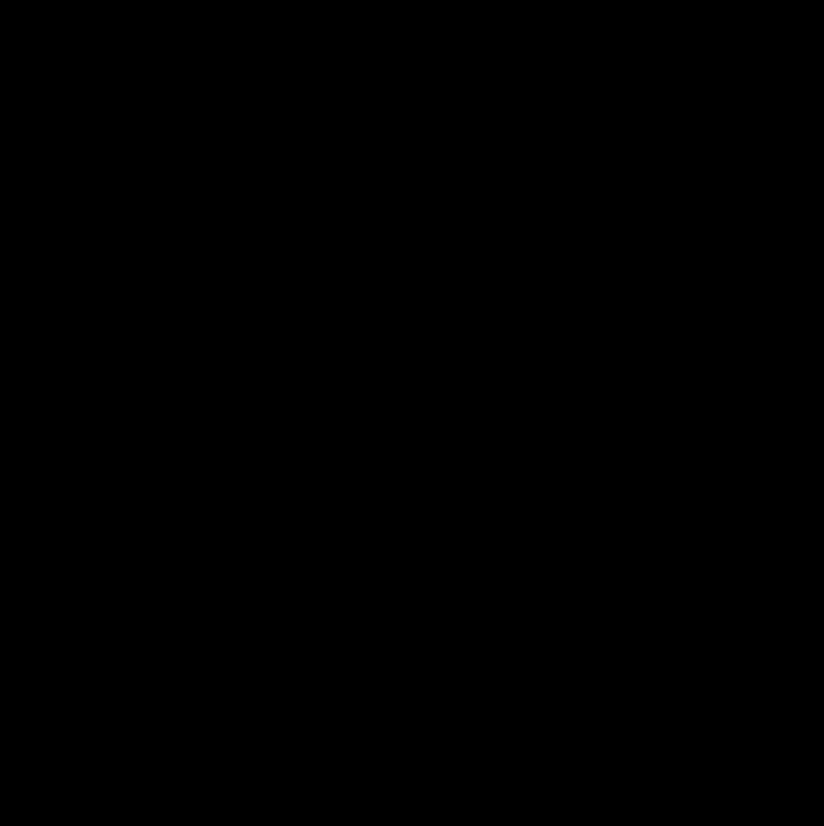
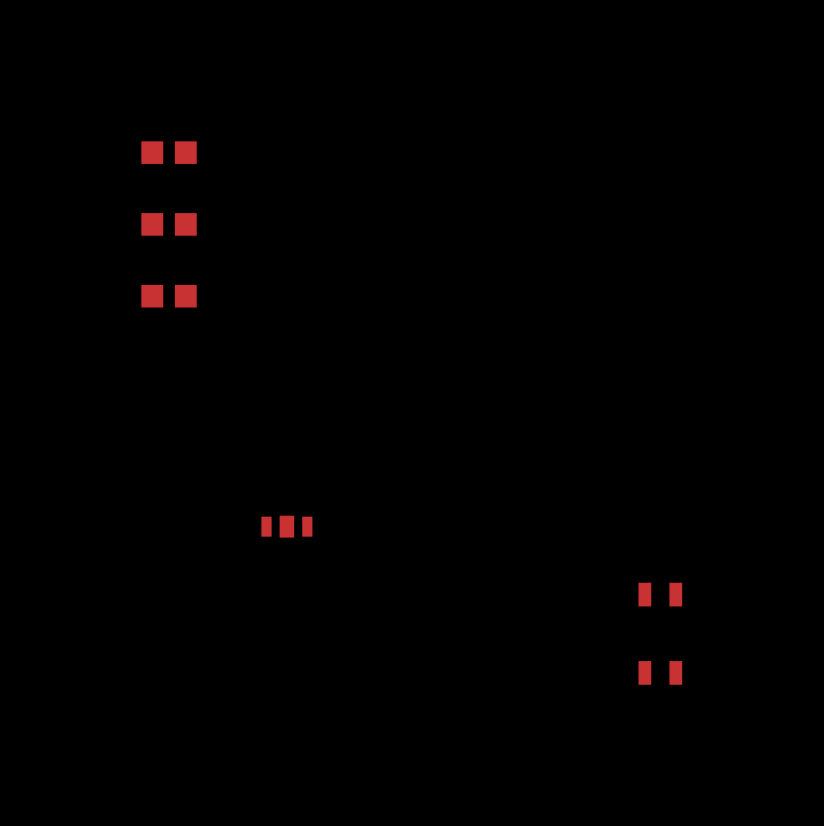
part: none -> (169, 152)
part: none -> (169, 224)
part: none -> (169, 296)
part: none -> (286, 526)
part: none -> (660, 594)
part: none -> (660, 672)

